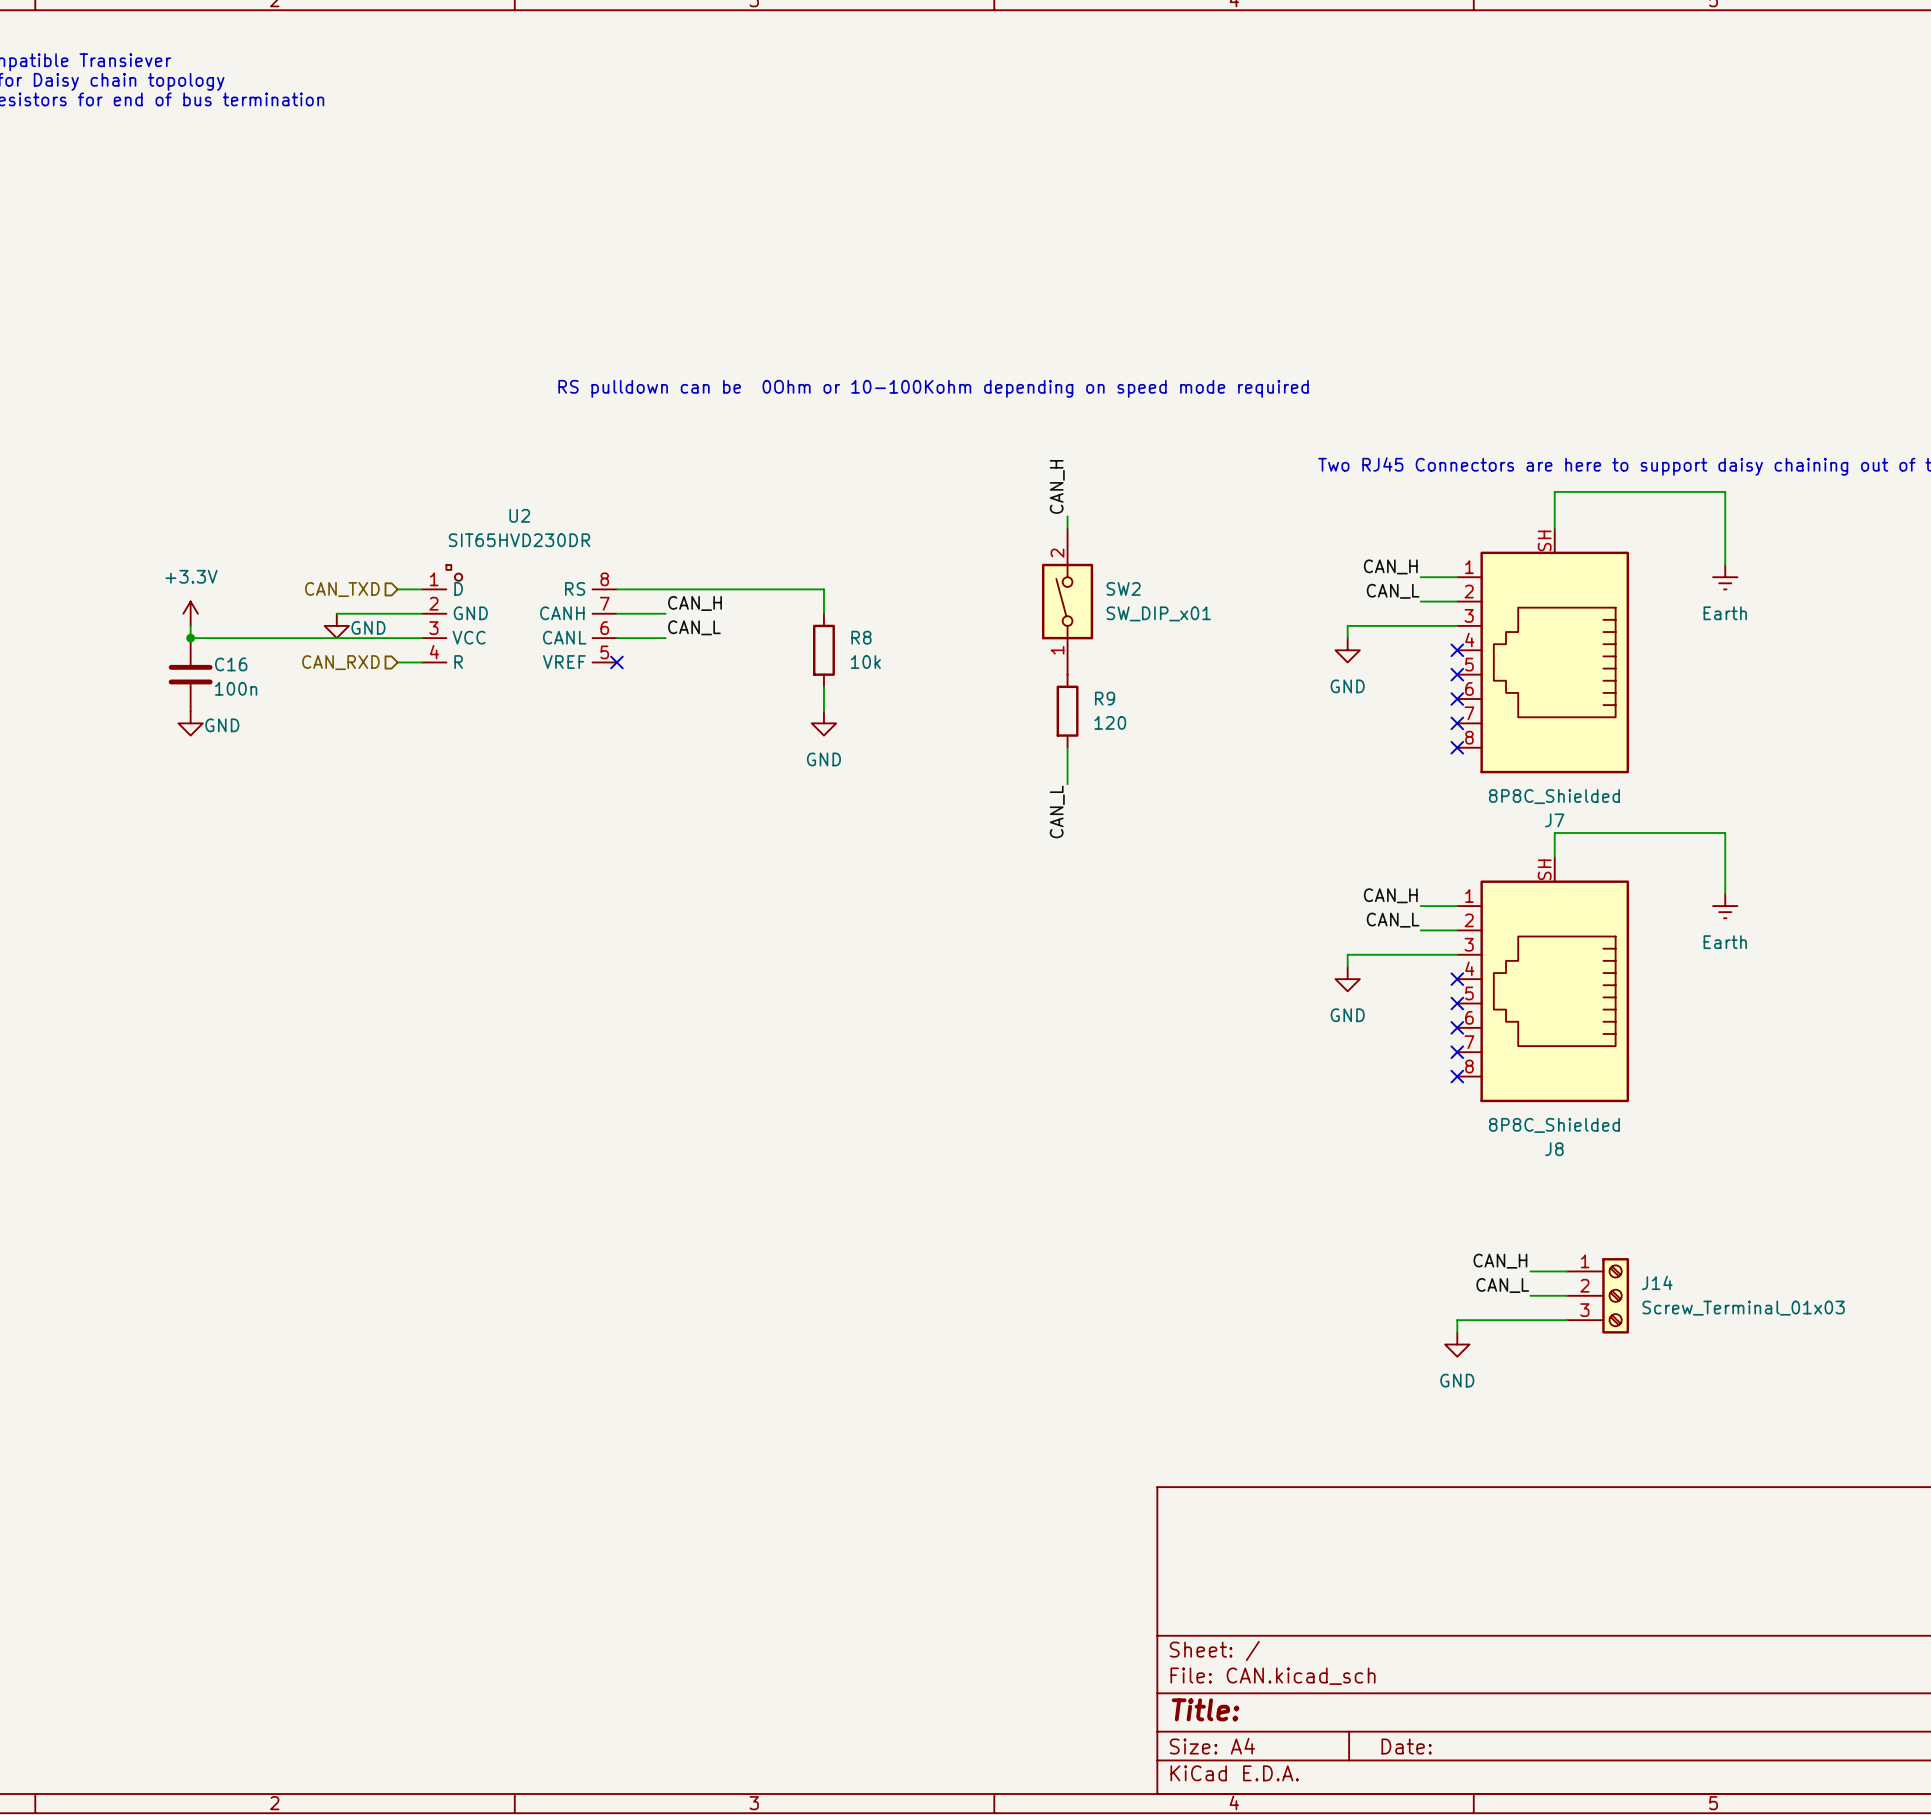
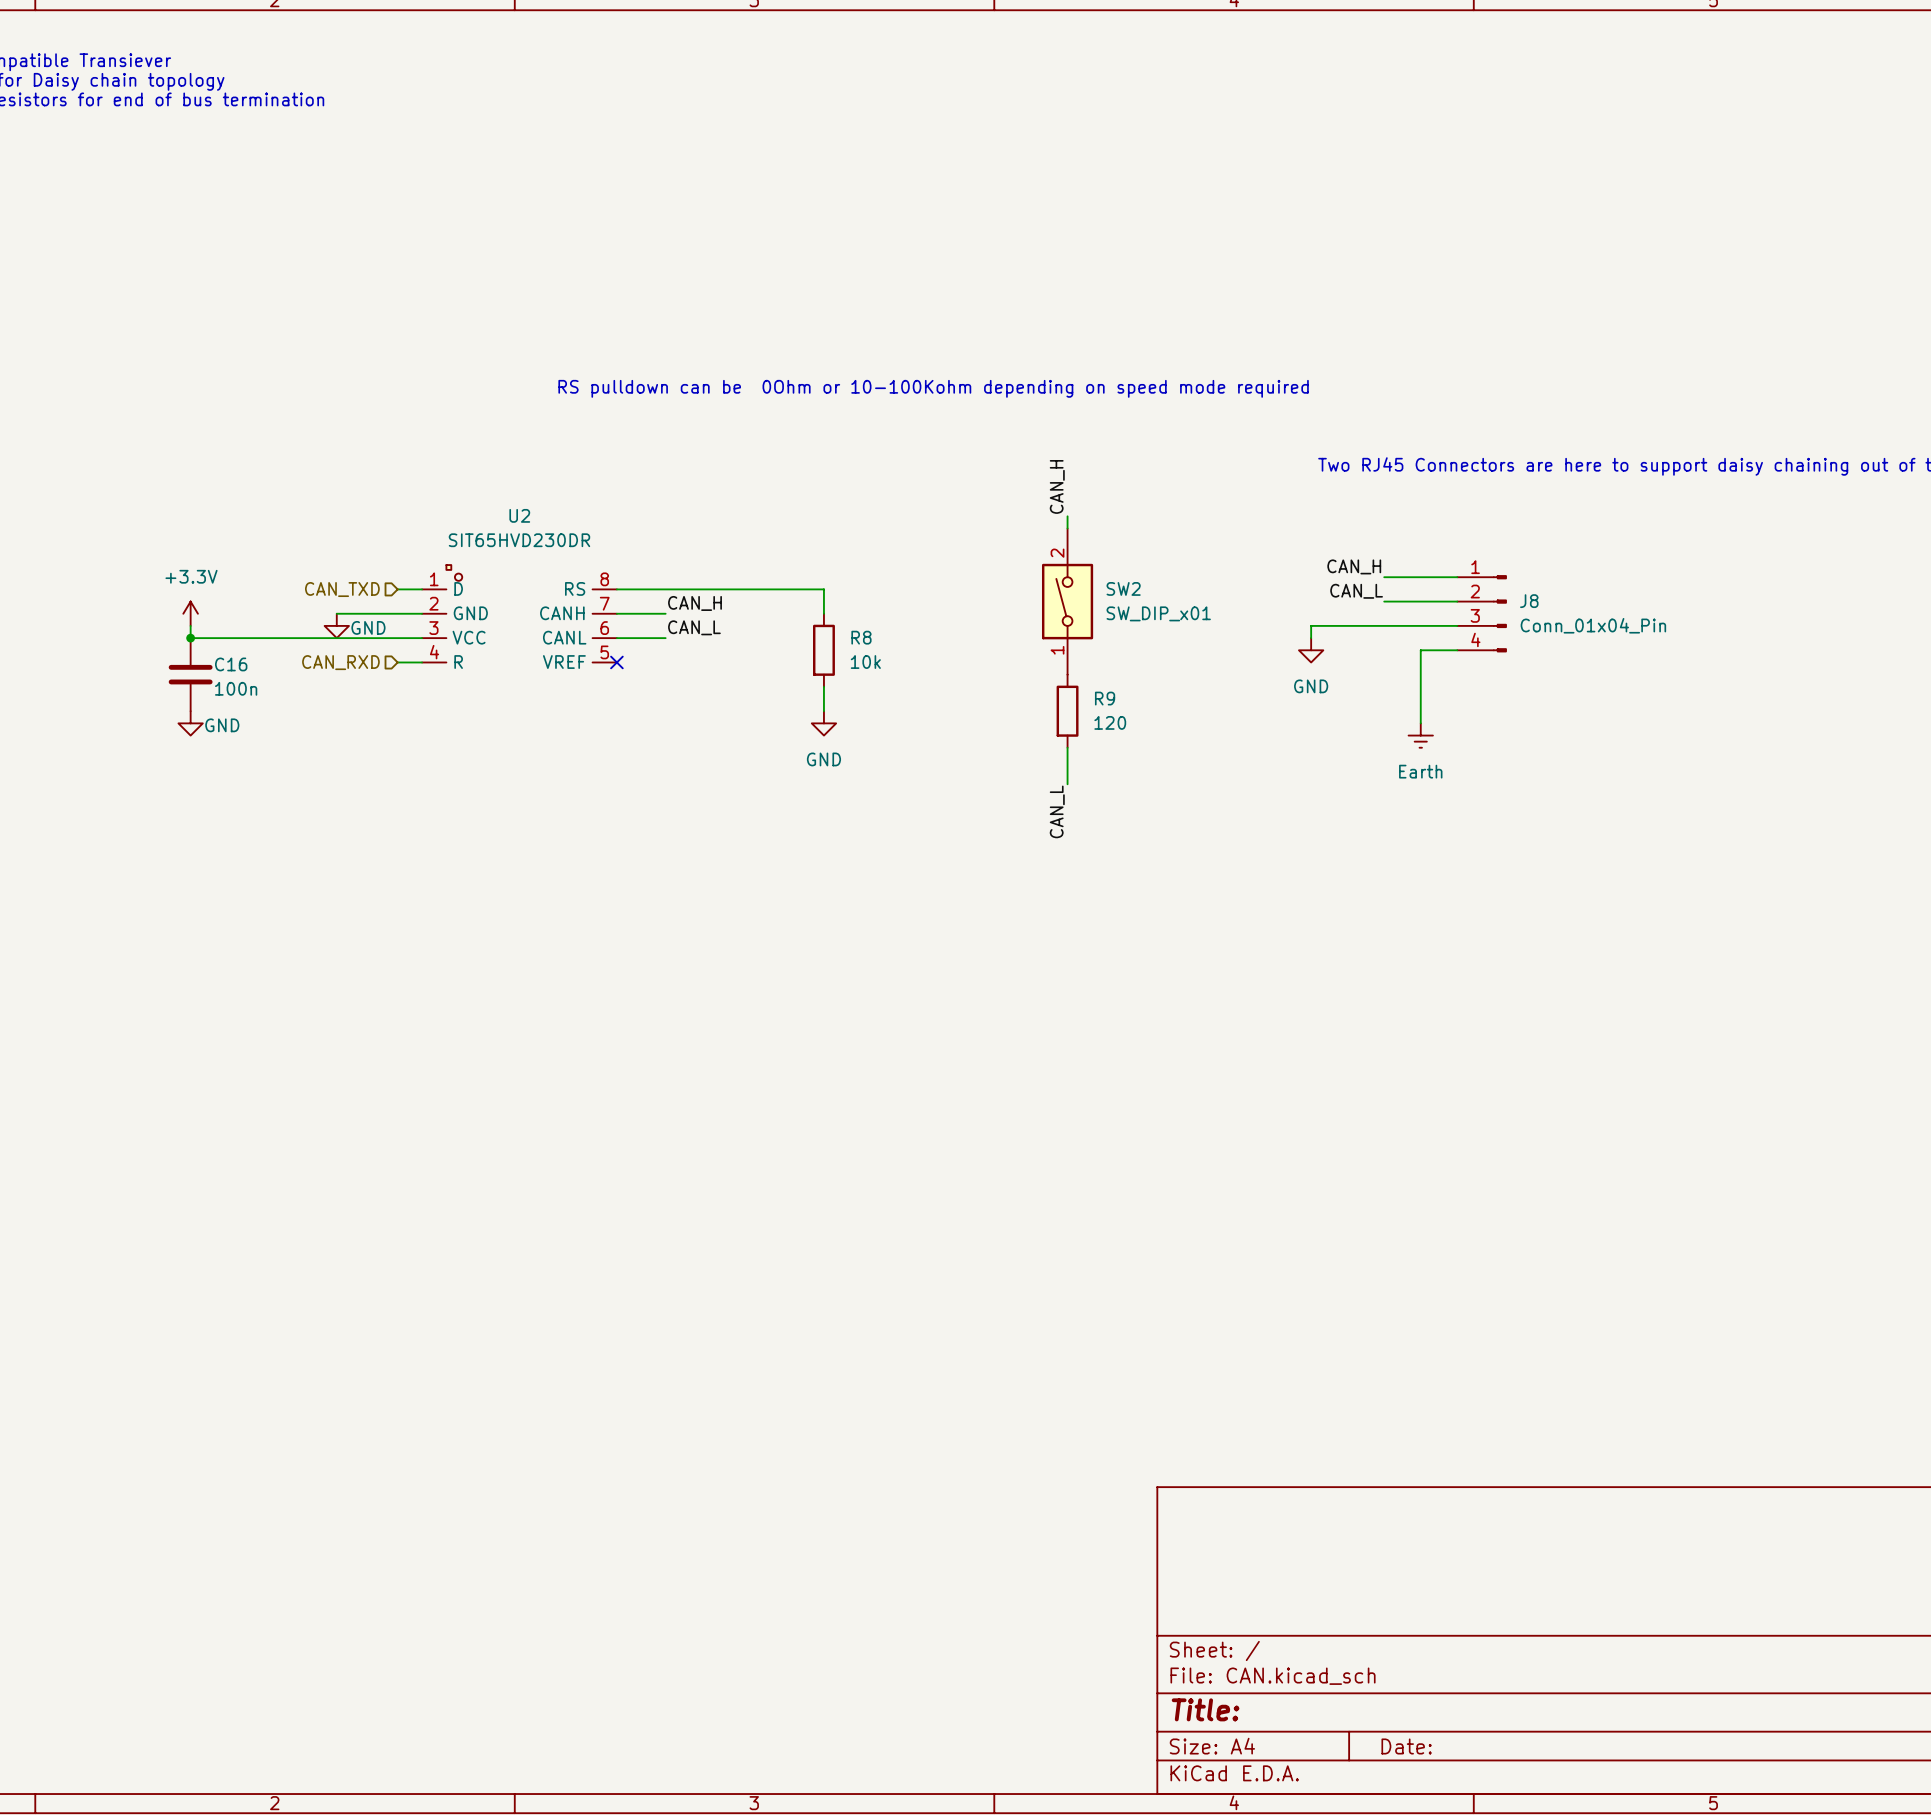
wire: (1554, 528) (1554, 491) (1725, 491) (1725, 565) -> none
label position: CAN_H (1390, 566) -> CAN_H (1354, 566)
wire: none -> (1384, 577) (1420, 577)
power symbol: Earth (1725, 577) -> none
label position: CAN_L (1393, 591) -> CAN_L (1356, 591)
wire: none -> (1384, 601) (1420, 601)
wire: (1347, 625) (1347, 638) -> (1347, 625) (1311, 625) (1311, 638)
power symbol position: GND (1347, 650) -> GND (1311, 650)
wire: none -> (1457, 650) (1420, 650) (1420, 723)
no-connect mark: (1457, 650) -> none
J7: 8P8C_Shielded (1543, 650) -> none
no-connect mark: (1457, 674) -> none
no-connect mark: (1457, 699) -> none
no-connect mark: (1457, 723) -> none
power symbol: none -> Earth (1420, 735)
no-connect mark: (1457, 747) -> none
J8 symbol: [1457, 857, 1630, 1103] -> [1457, 575, 1507, 653]
wire: (1554, 857) (1554, 832) (1725, 832) (1725, 893) -> none
label: CAN_H (1390, 895) -> none
wire: (1420, 906) (1457, 906) -> none
power symbol: Earth (1725, 906) -> none
label: CAN_L (1393, 920) -> none
wire: (1420, 930) (1457, 930) -> none
wire: (1457, 954) (1347, 954) (1347, 966) -> none
power symbol: GND (1347, 979) -> none
no-connect mark: (1457, 979) -> none
no-connect mark: (1457, 1003) -> none
no-connect mark: (1457, 1027) -> none
no-connect mark: (1457, 1052) -> none
no-connect mark: (1457, 1076) -> none
J8 value: 8P8C_Shielded (1554, 1125) -> Conn_01x04_Pin (1593, 625)
J8 name position: J8 (1554, 1149) -> J8 (1529, 601)
label: CAN_H (1500, 1261) -> none
wire: (1530, 1271) (1566, 1271) -> none
label: CAN_L (1502, 1285) -> none
wire: (1530, 1295) (1566, 1295) -> none
J14: Screw_Terminal_01x03 (1597, 1295) -> none
wire: (1566, 1320) (1457, 1320) (1457, 1332) -> none
power symbol: GND (1457, 1344) -> none

